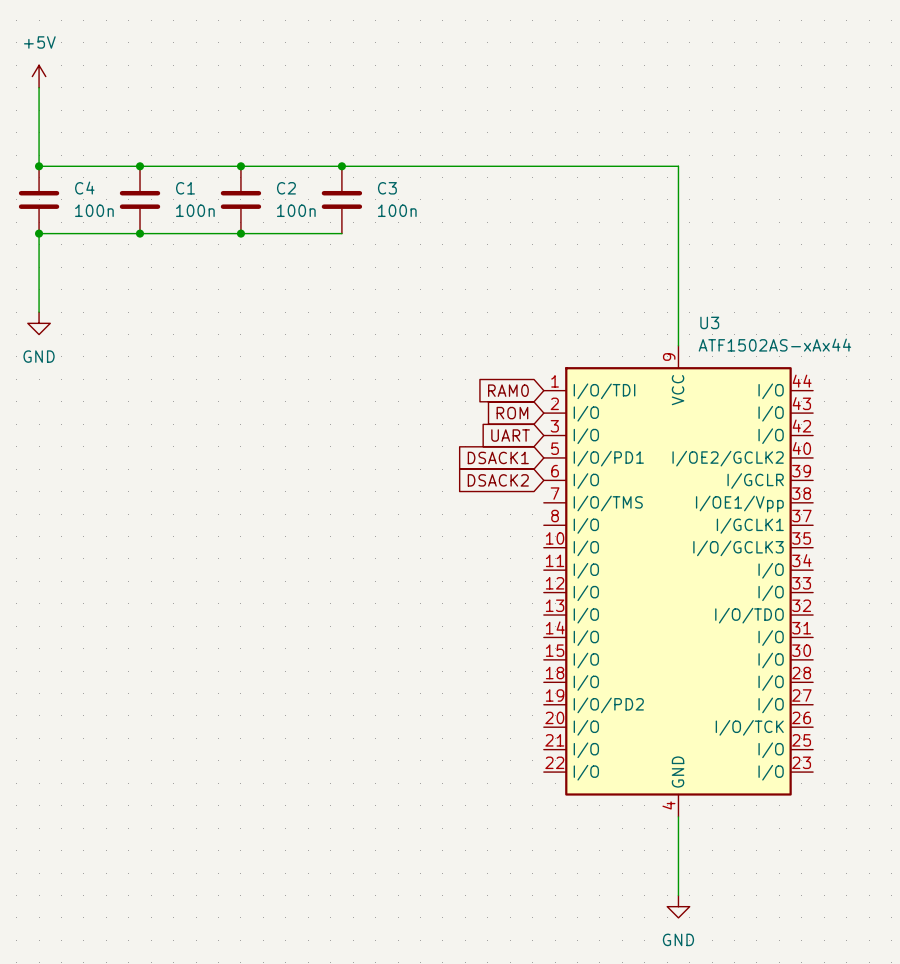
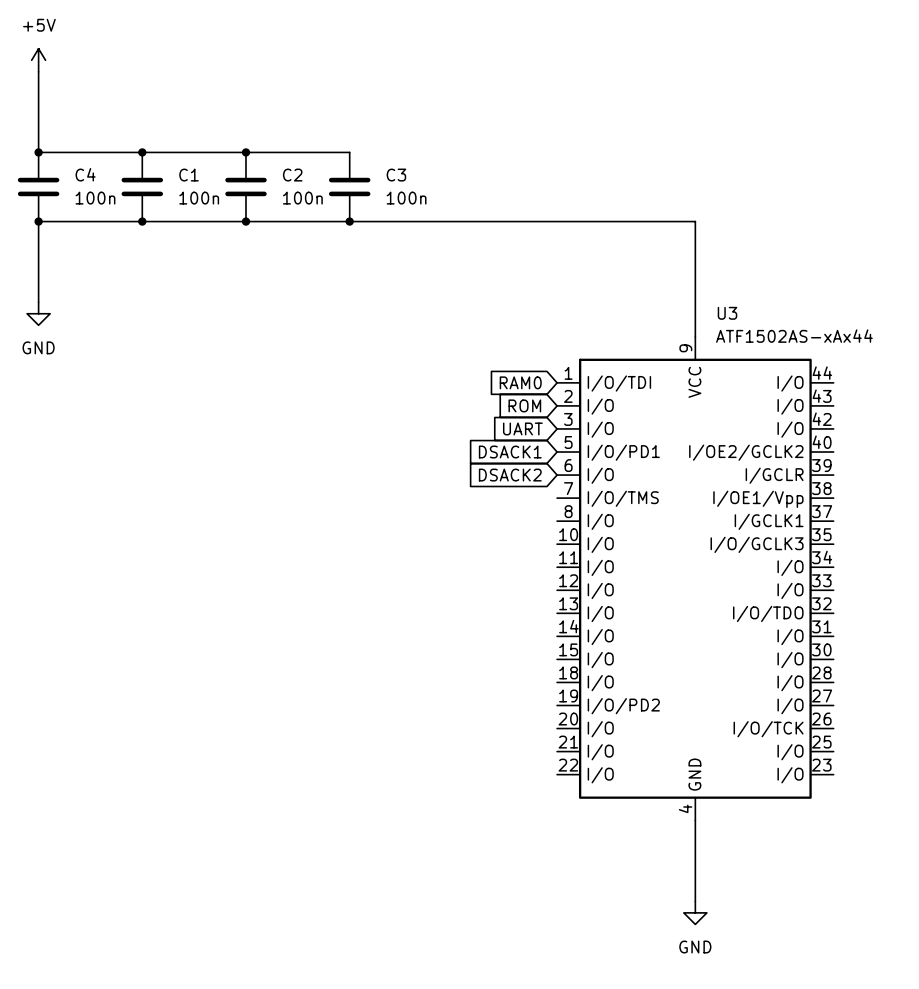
wire: (341, 166) (678, 166) (678, 233) -> (349, 221) (695, 221)
junction: (341, 166) -> none
junction: none -> (349, 221)

